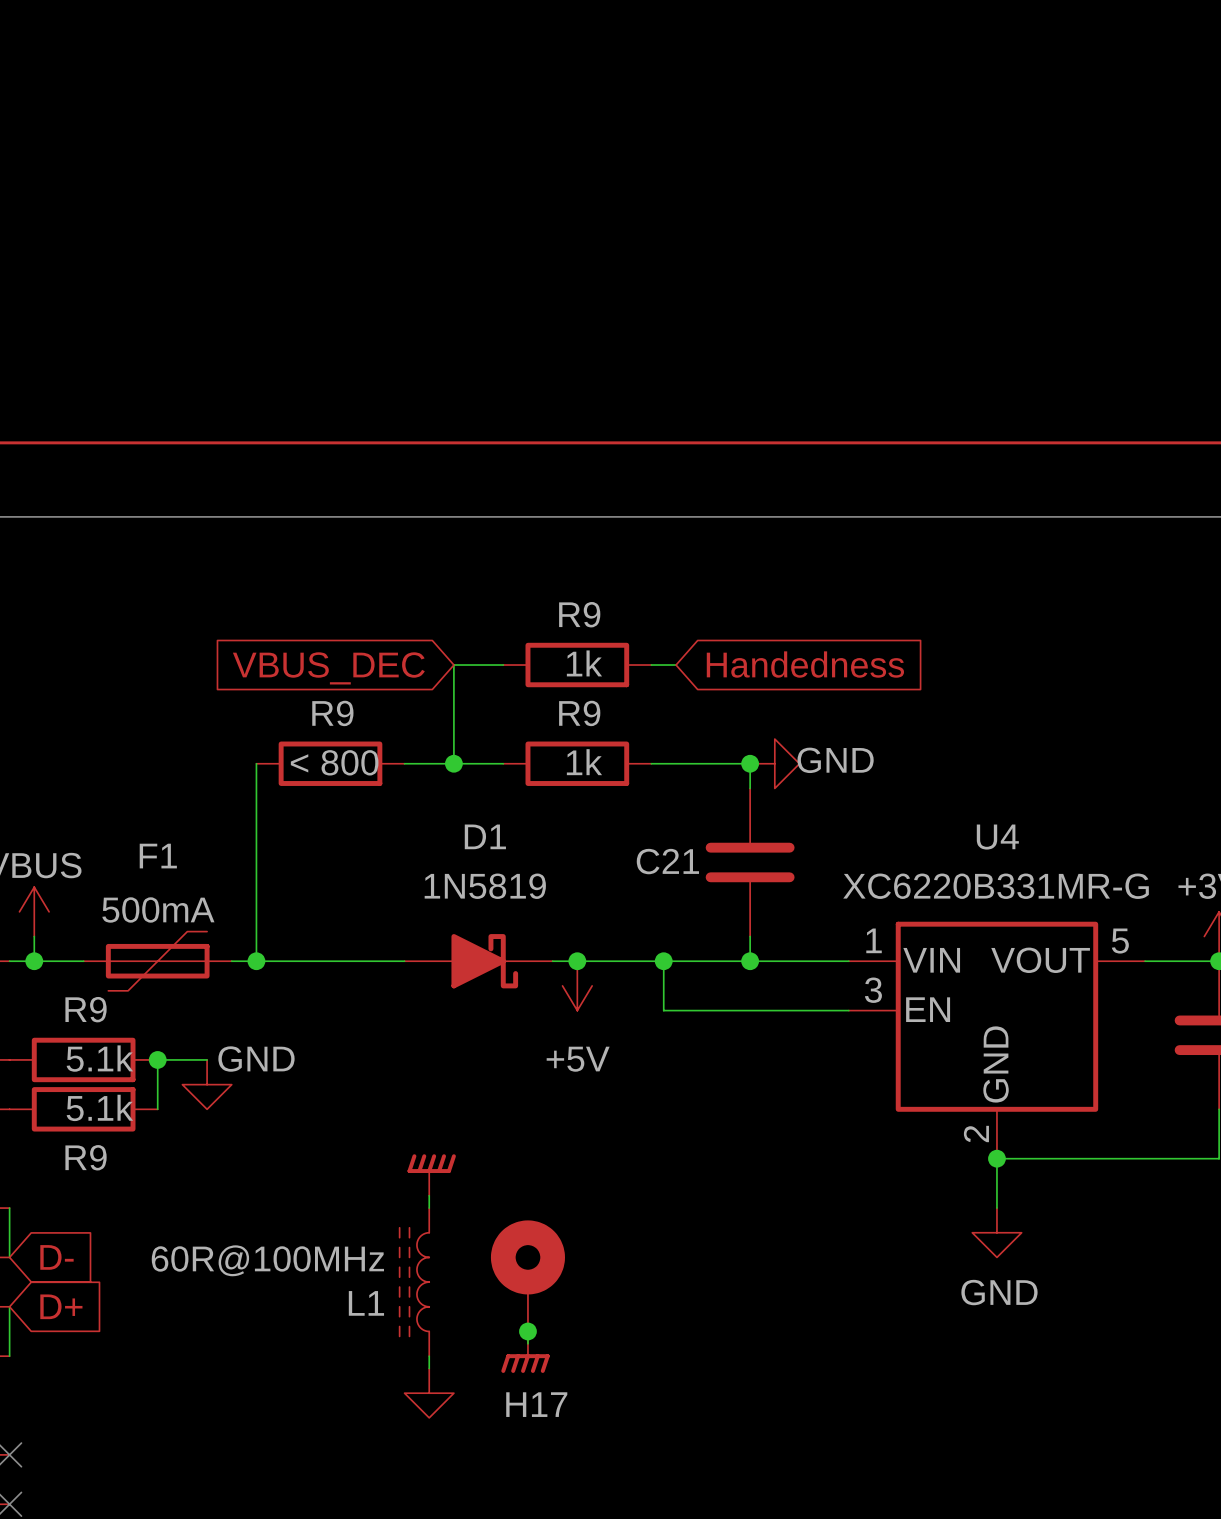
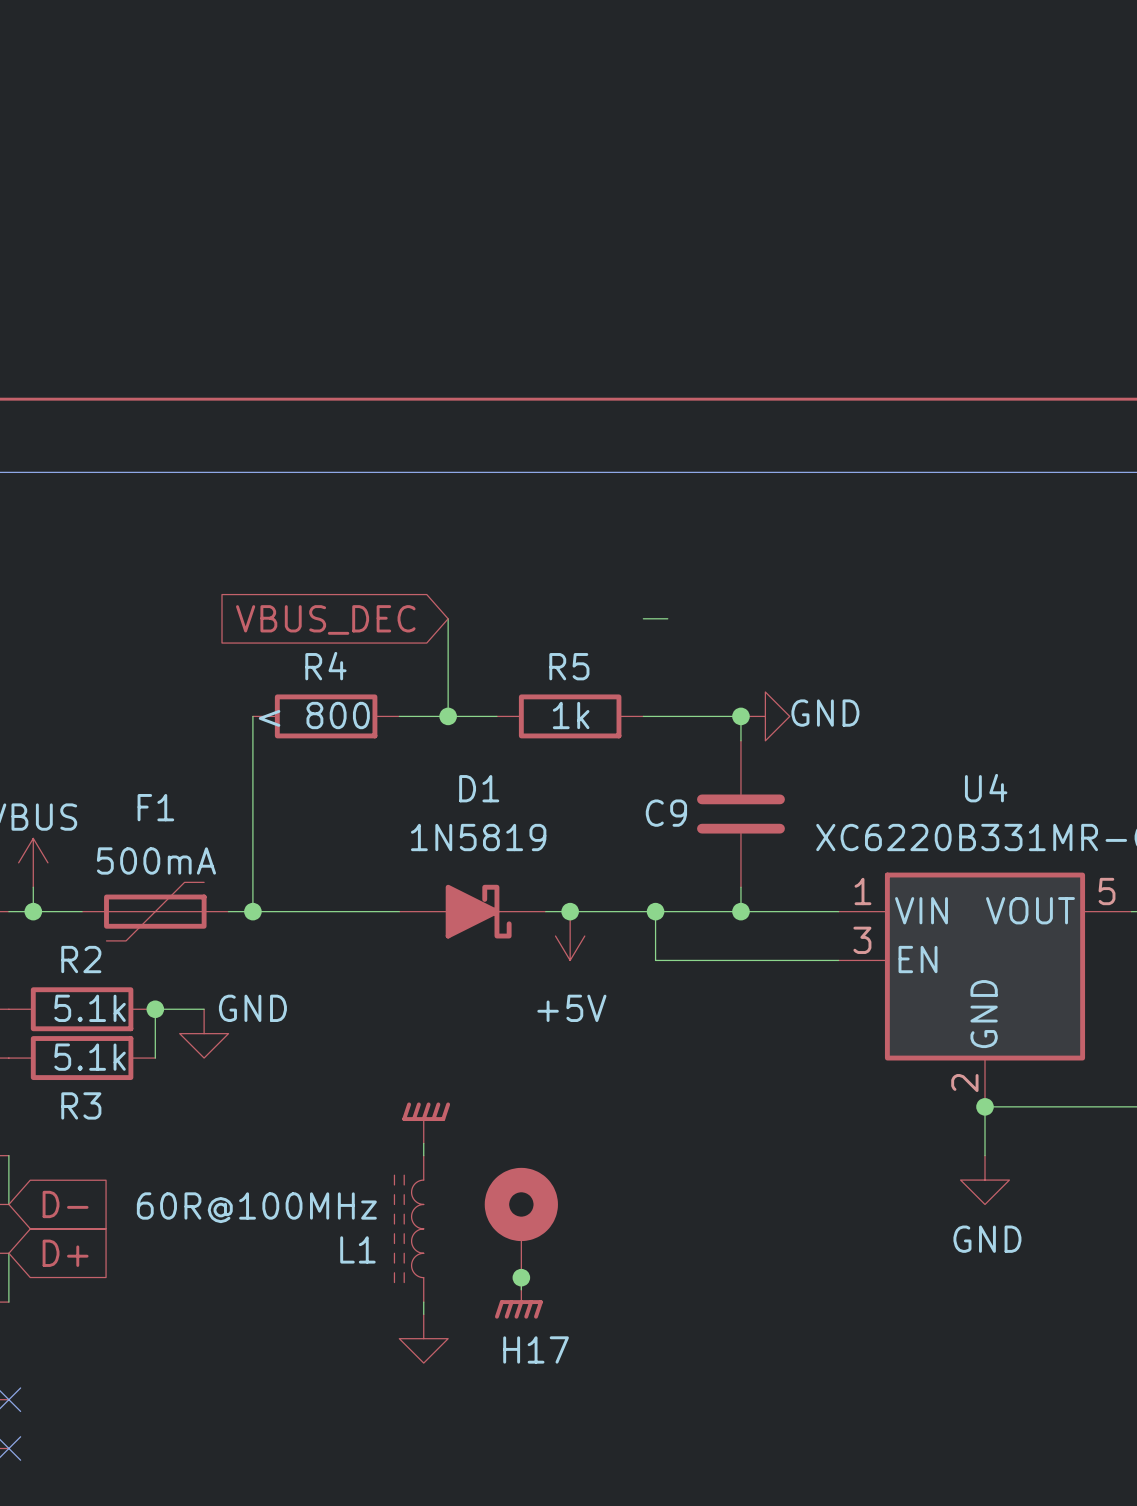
global label: Handedness (805, 664) -> none
wire: (453, 665) (503, 665) -> none
R9: 1k (577, 665) -> none
R9 name: R9 (332, 713) -> R4 (325, 666)
R9 name: R9 (579, 713) -> R5 (569, 666)
C21 name: C21 (667, 861) -> C9 (666, 813)
R9 name: R9 (86, 1009) -> R2 (81, 959)
R9 name: R9 (86, 1157) -> R3 (81, 1105)

